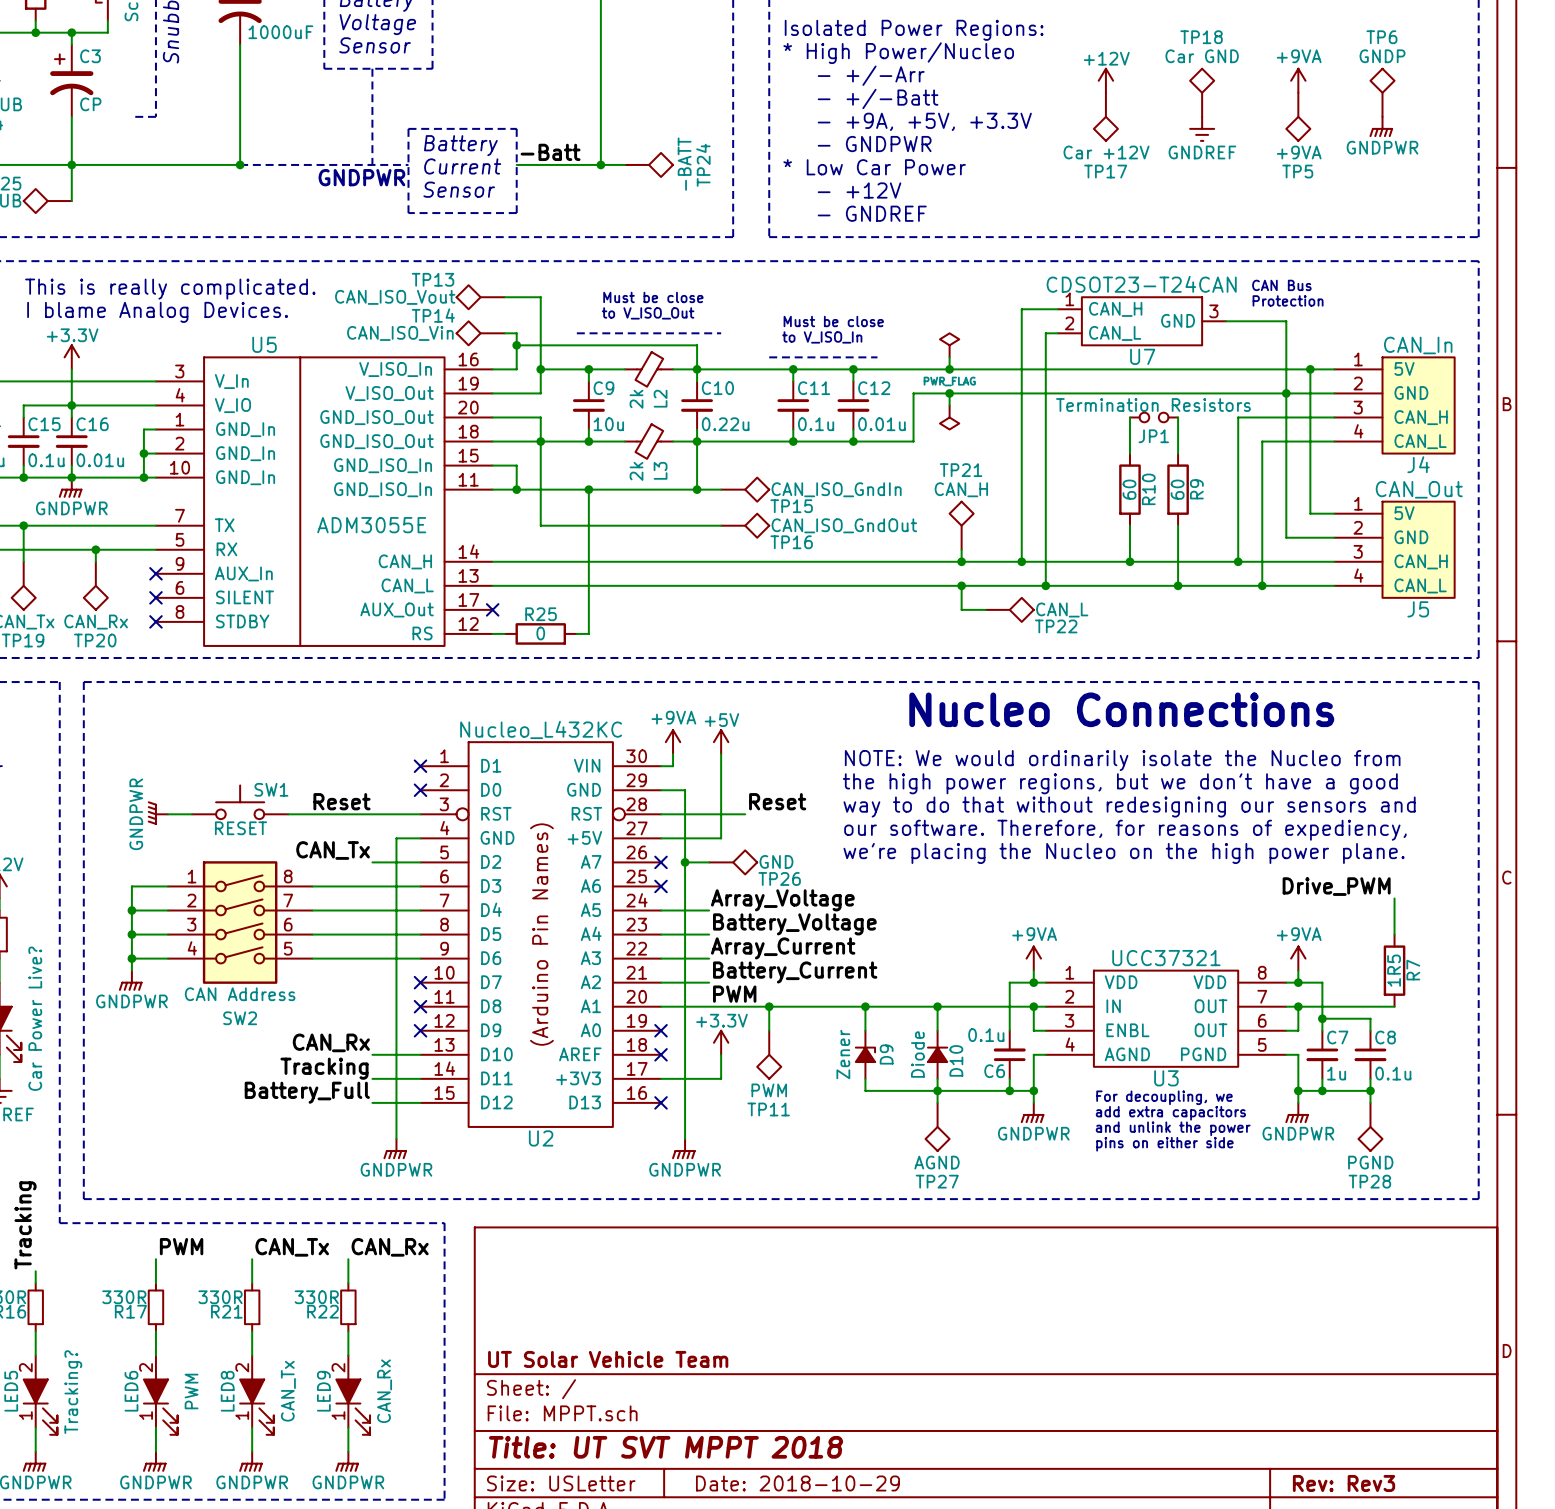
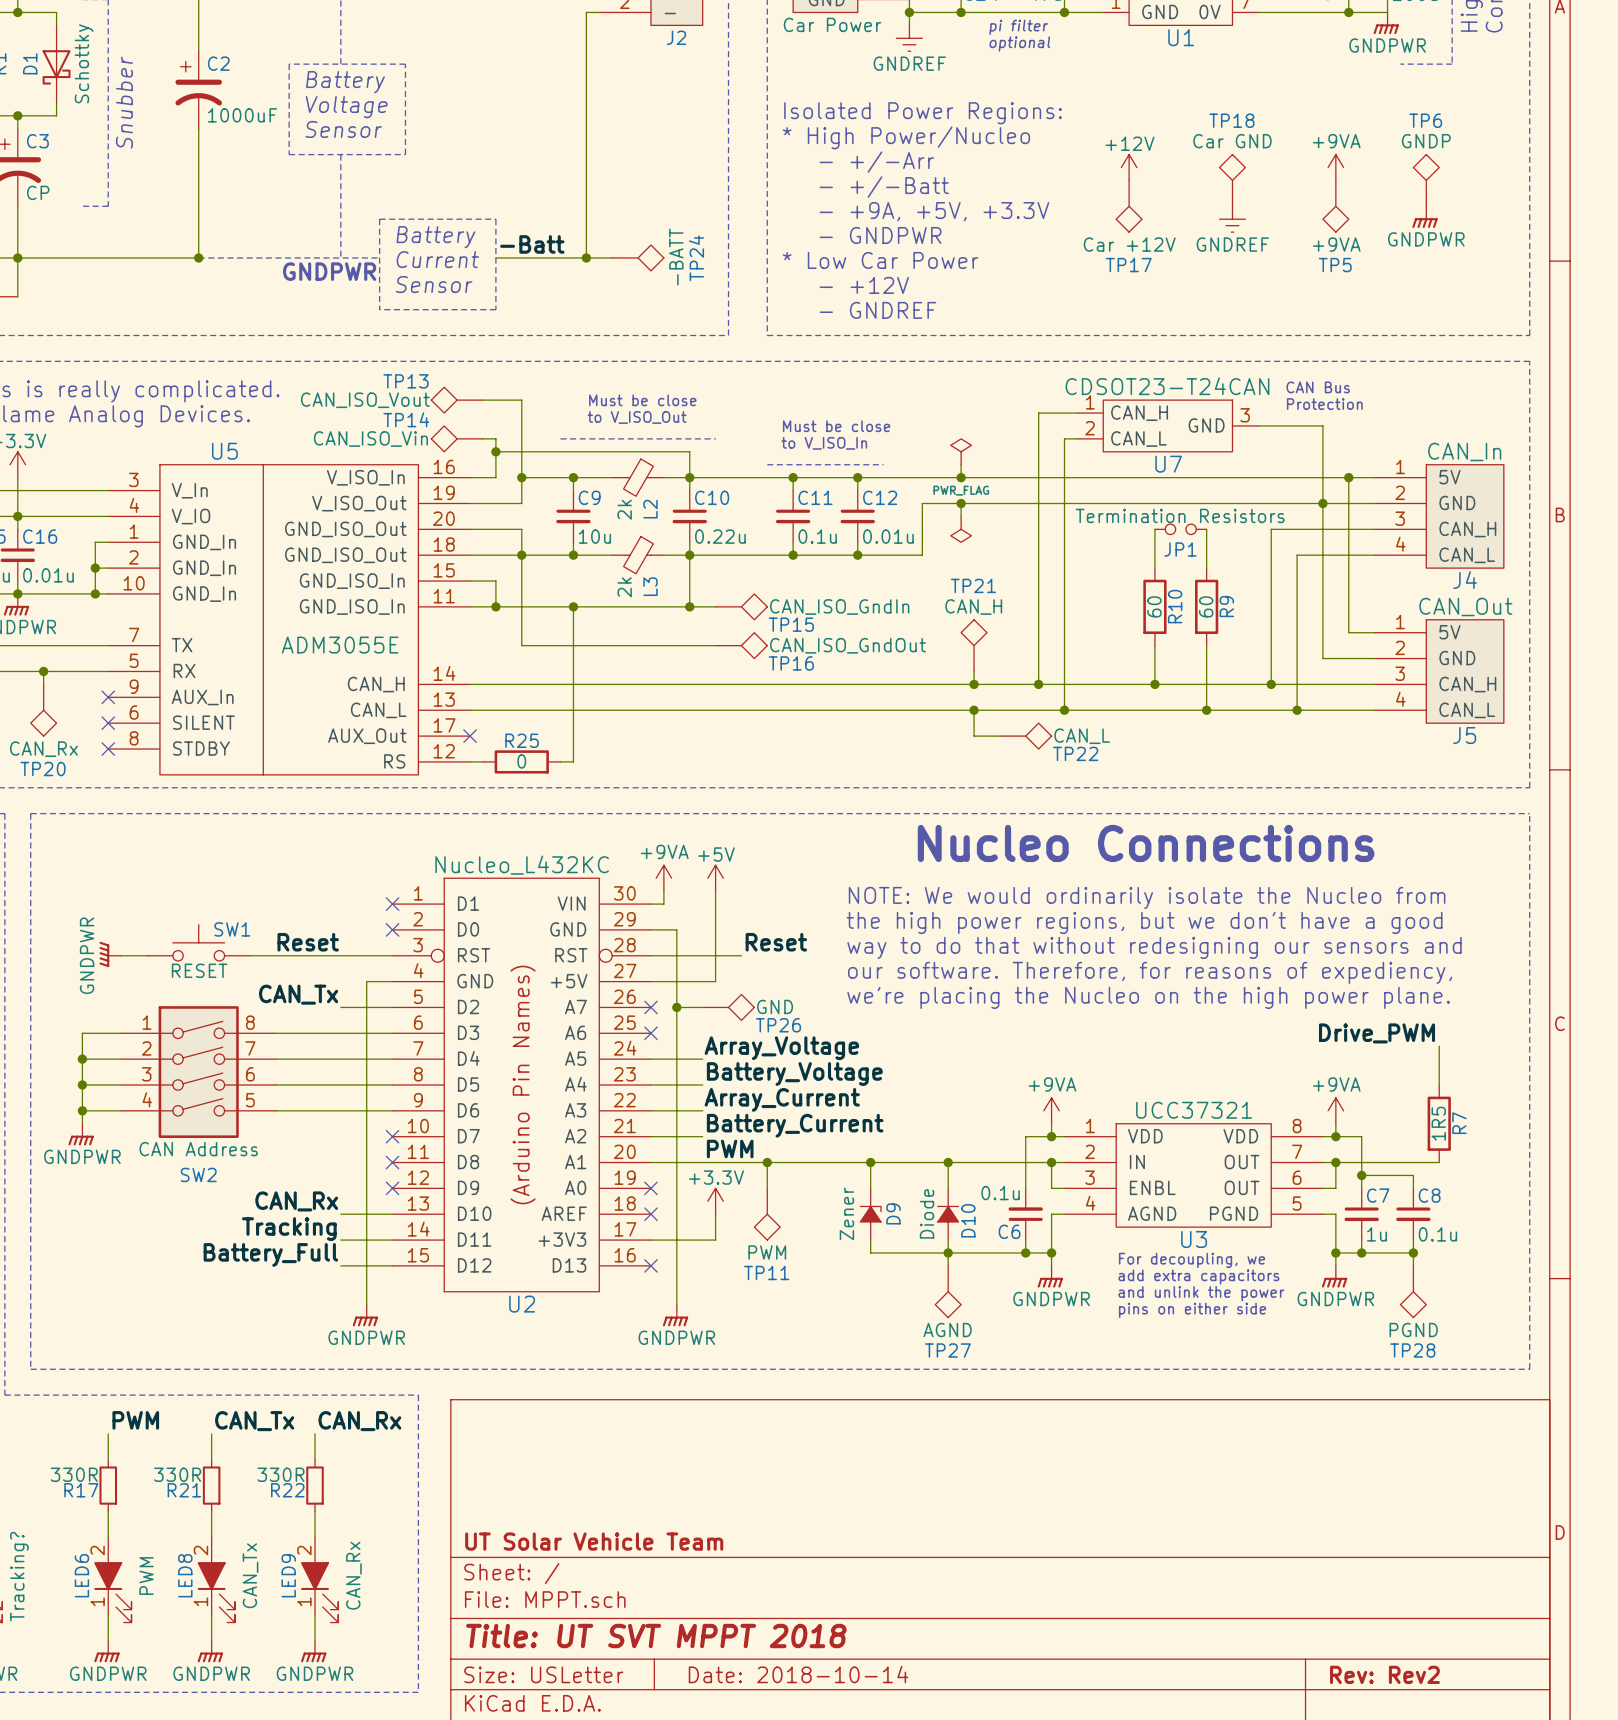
title block: Date: 2018-10-29 (797, 1483) -> Date: 2018-10-14 (798, 1674)
title block: Rev: Rev3 (1344, 1483) -> Rev: Rev2 (1384, 1674)

